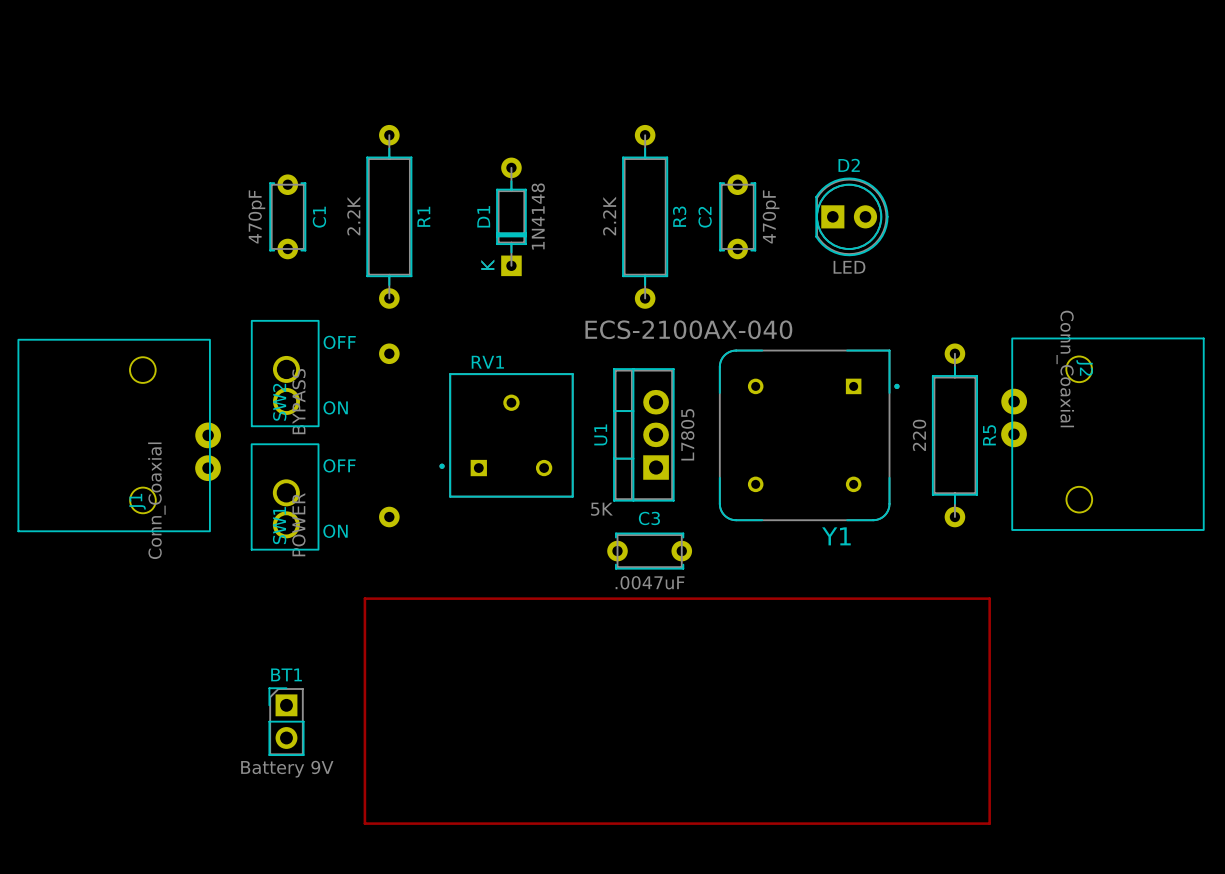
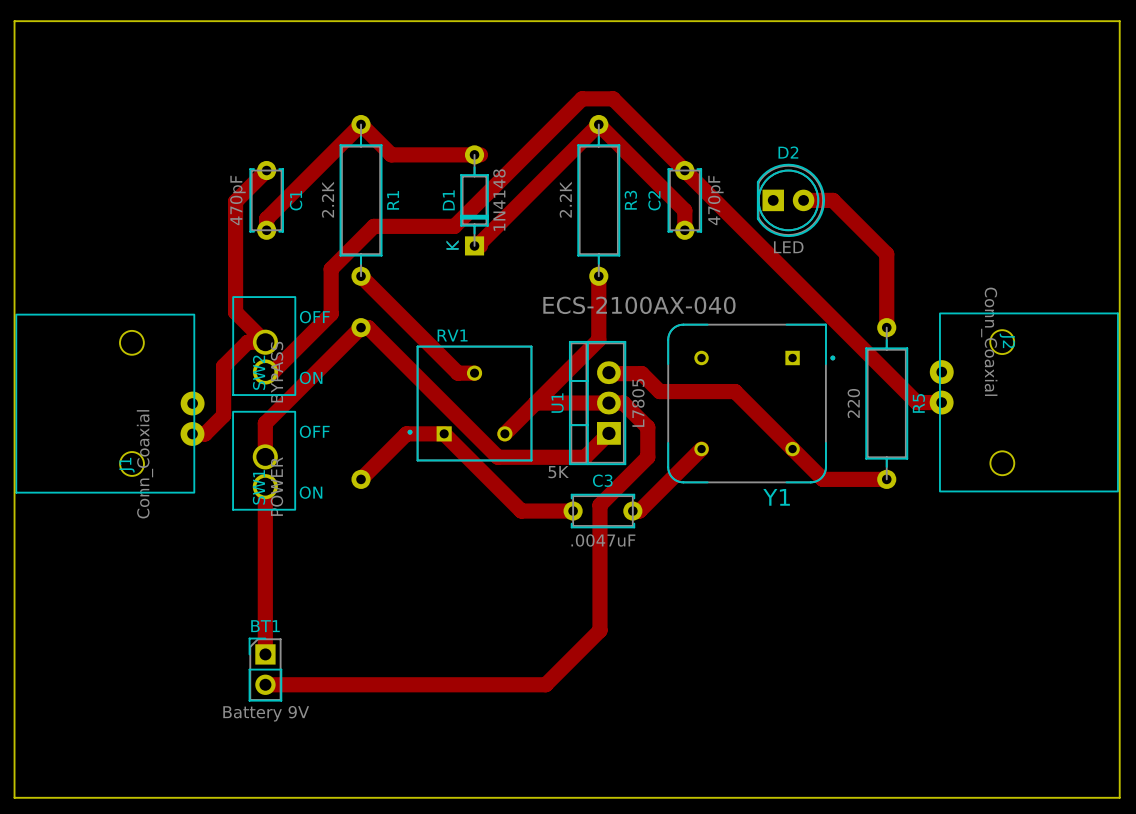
board edge: none -> (14, 21) (1119, 21) (1119, 797) (14, 797) (14, 21)
track: none -> (480, 154) (391, 154) (361, 124) (266, 218) (266, 230)
track: none -> (266, 170) (235, 201) (235, 312) (265, 342) (247, 342) (223, 366) (223, 415) (205, 433) (192, 433)
track: none -> (803, 200) (832, 200) (886, 254) (886, 327)
track: none -> (684, 230) (684, 210) (598, 124) (480, 242) (480, 245)
track: none -> (361, 276) (457, 373) (474, 373)
track: none -> (598, 276) (598, 339) (504, 433)
track: none -> (265, 371) (273, 371) (331, 313) (331, 269) (373, 226) (454, 226) (582, 98) (613, 98) (916, 402) (941, 402)
track: none -> (608, 372) (641, 373) (659, 391) (735, 391) (822, 479) (886, 479)
track: none -> (535, 403) (623, 403) (647, 427) (647, 457) (599, 505) (599, 630) (545, 684) (265, 684)
track: none -> (608, 433) (585, 457) (497, 457) (368, 327) (361, 327) (265, 423) (265, 456)
track: none -> (701, 449) (639, 511) (632, 511)
track: none -> (361, 479) (406, 433) (444, 433) (521, 511) (573, 511)
track: none -> (265, 486) (265, 654)
track: (364, 598) (989, 598) (989, 823) (364, 823) (364, 598) -> none

